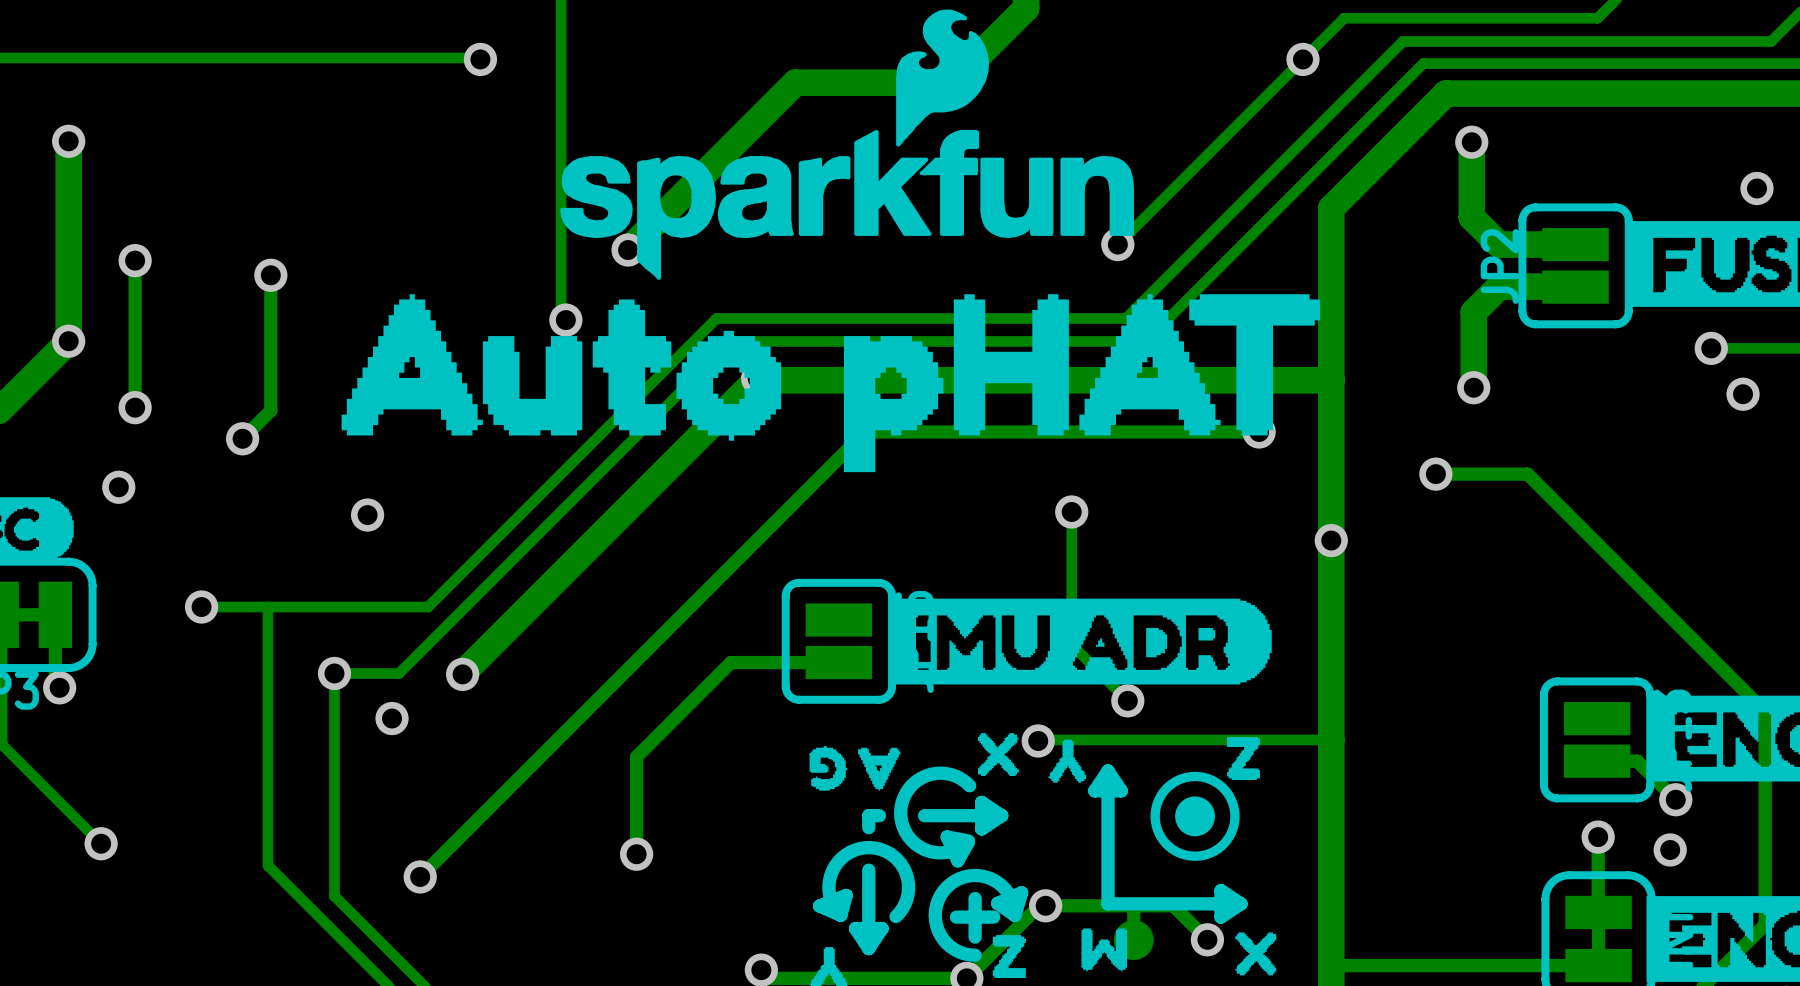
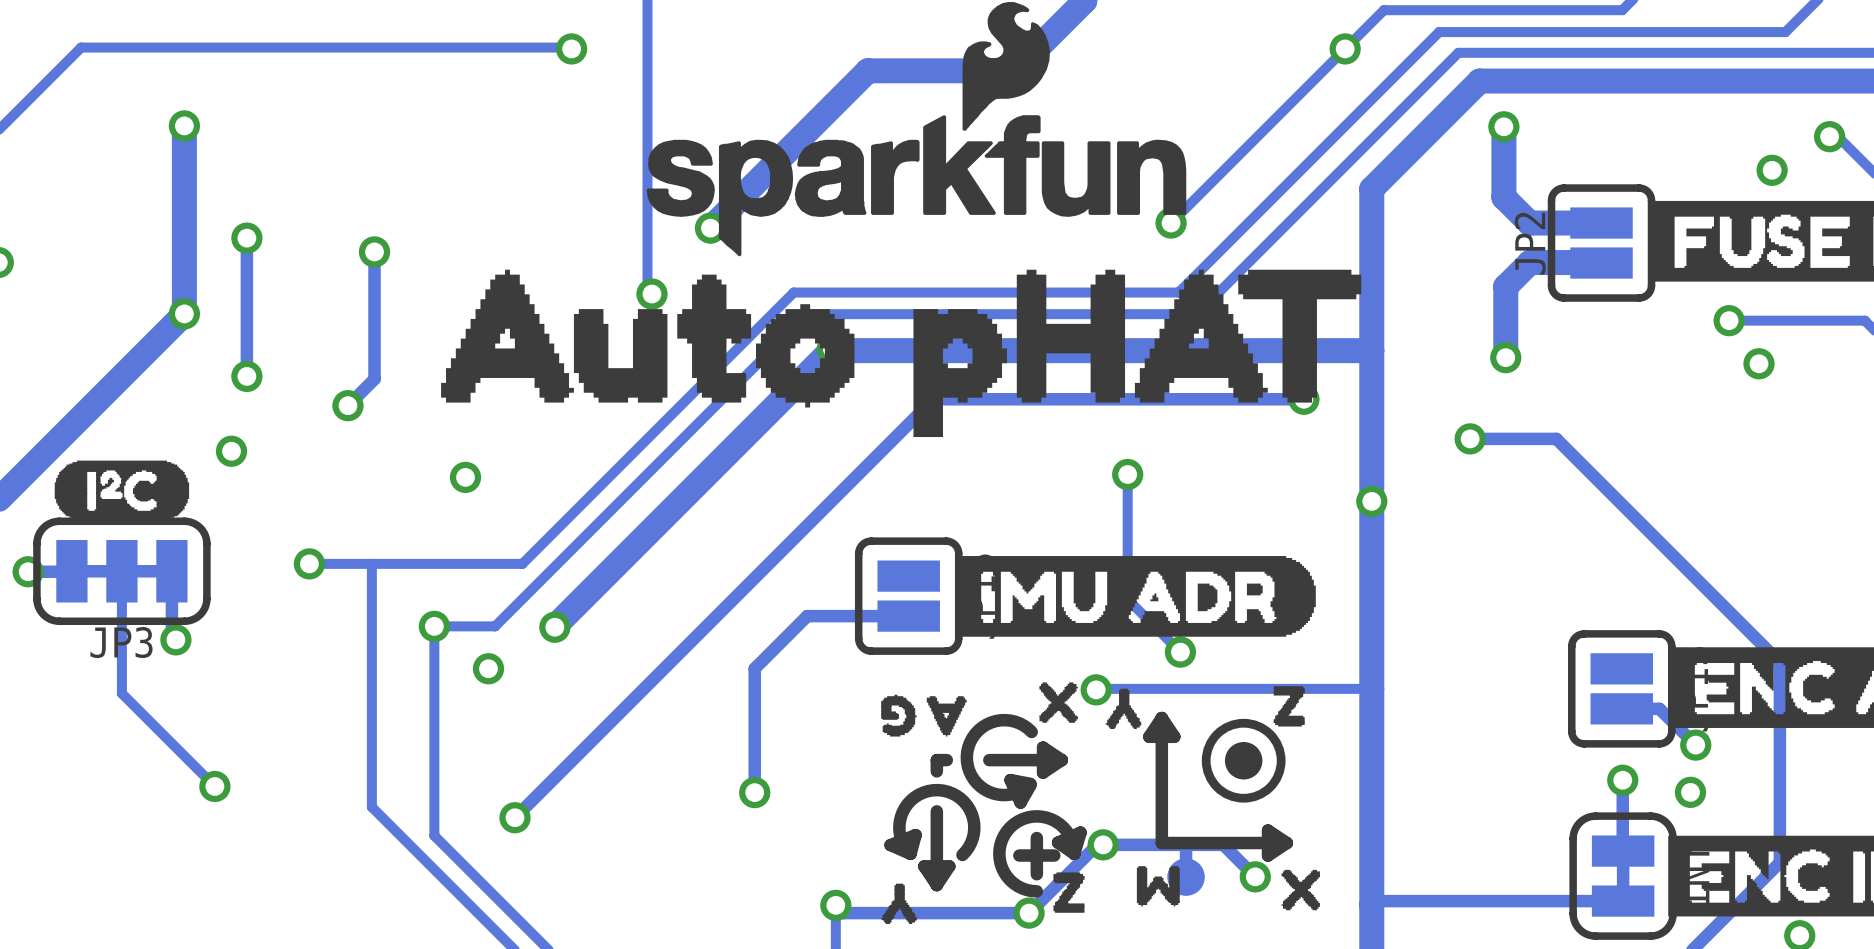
track: (675, 718) (636, 756) (636, 854) -> (754, 668) (754, 792)
via position: (636, 854) -> (754, 792)

